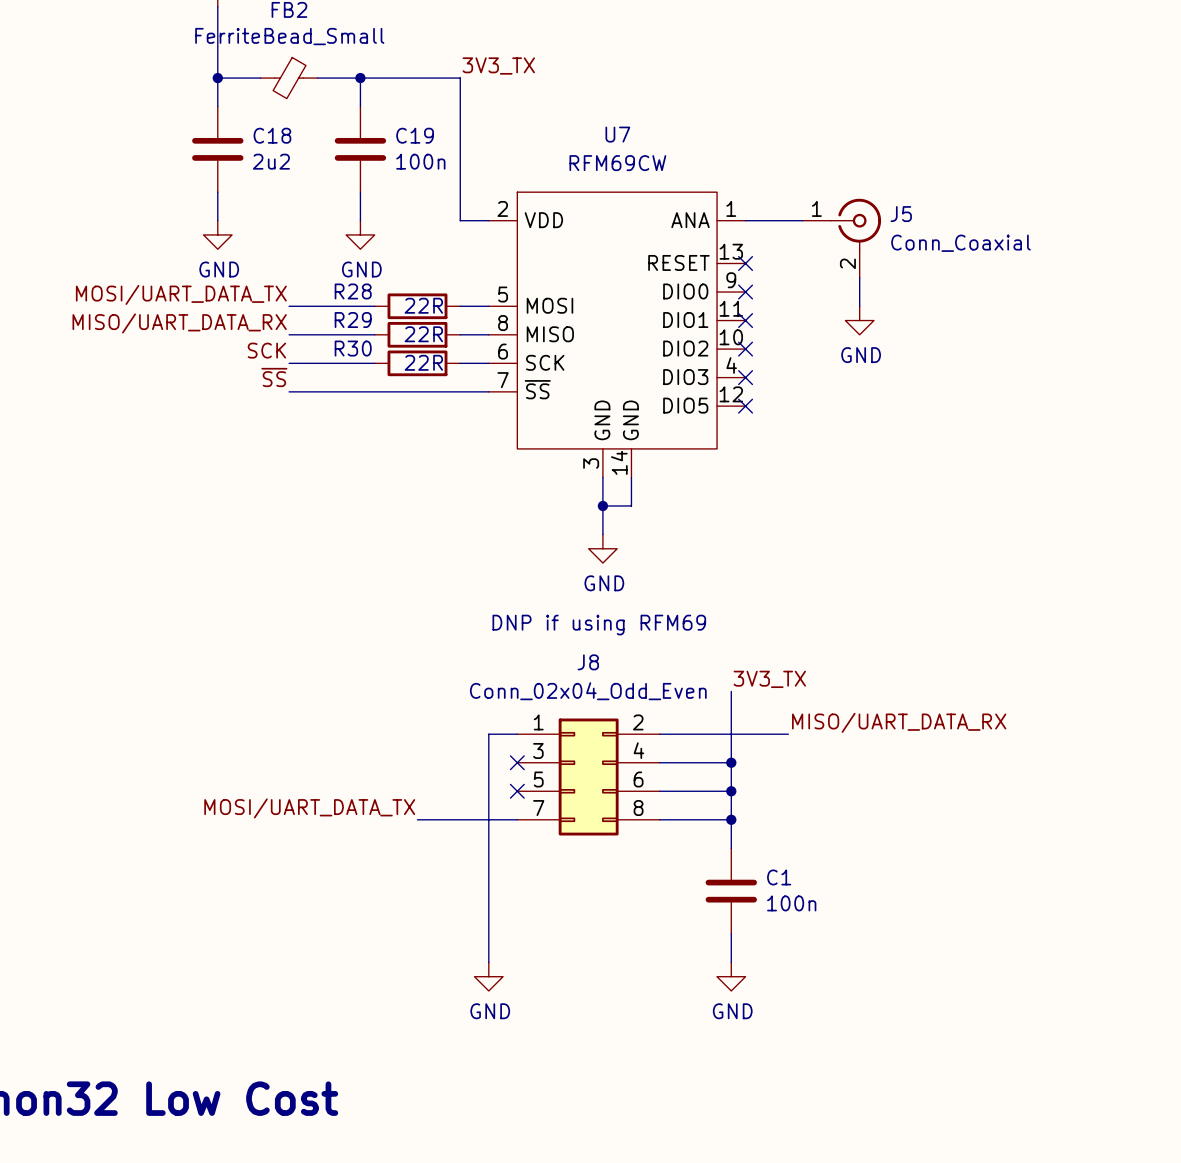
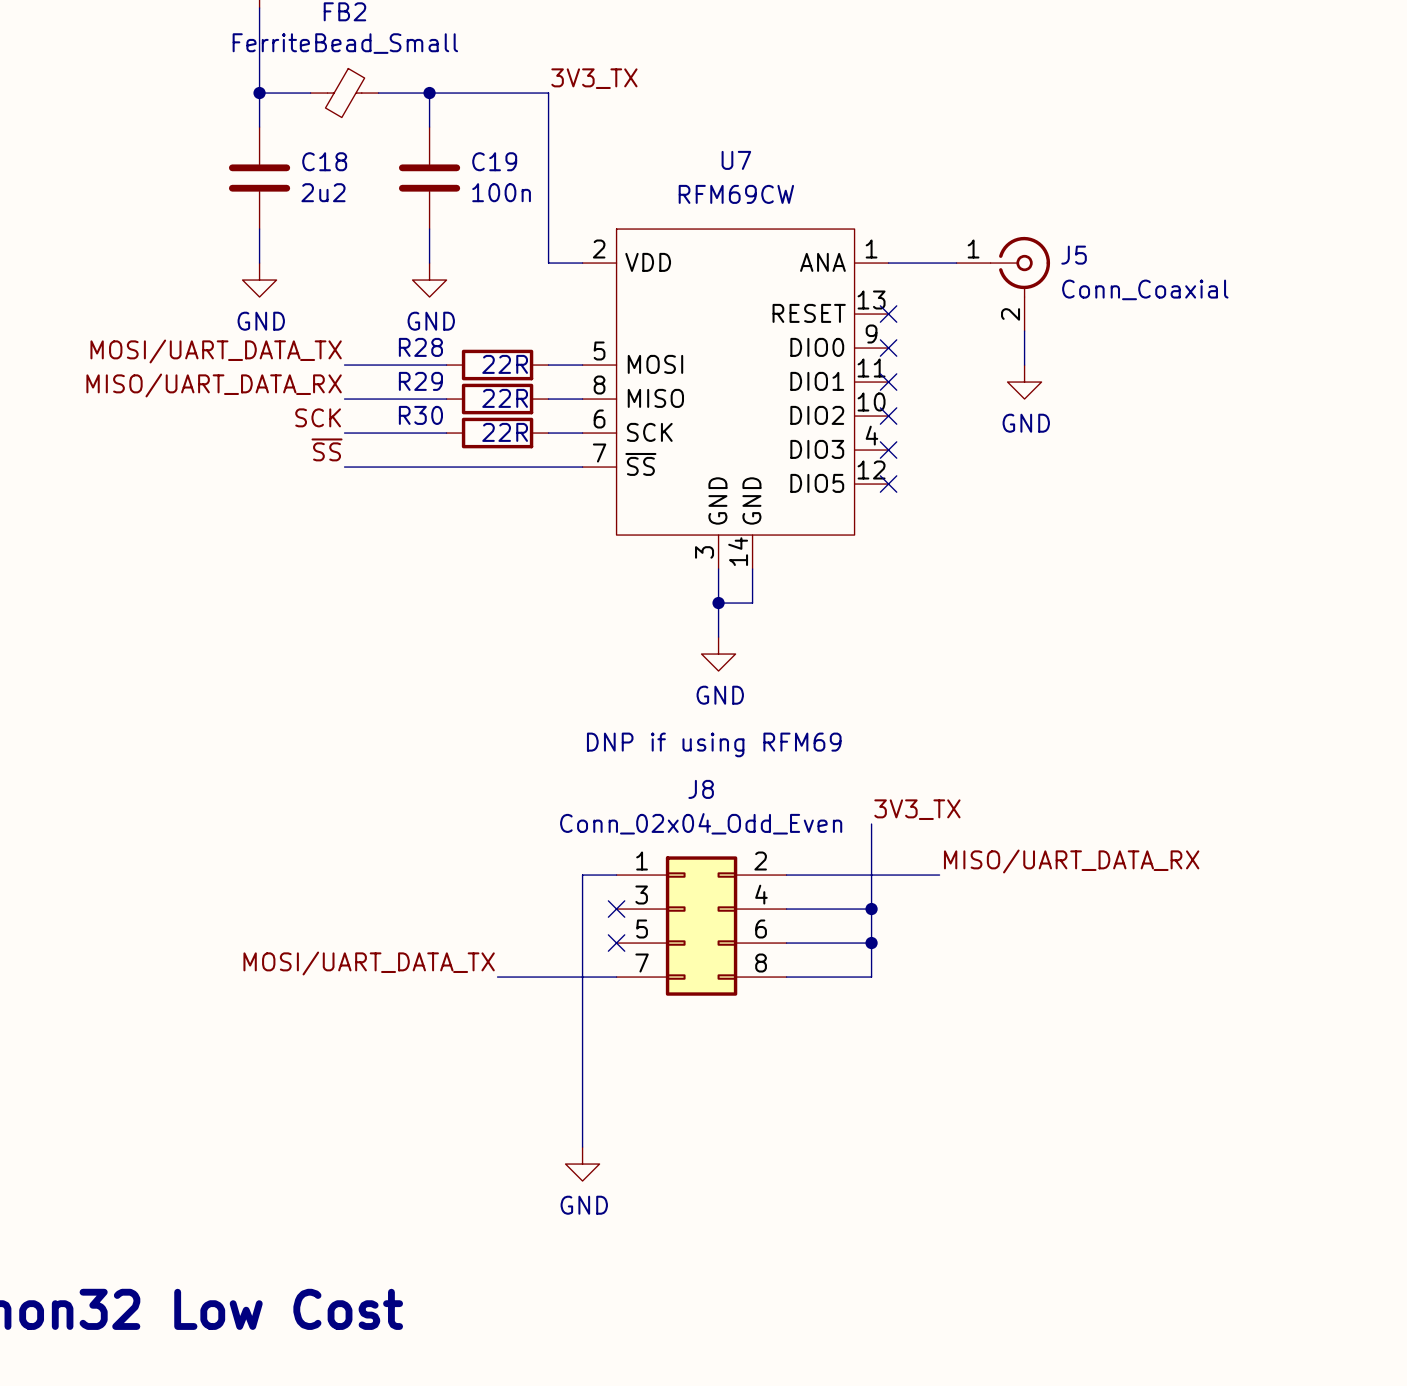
wire: (731, 819) (731, 848) -> none
junction: (731, 819) -> none
C1: 100n (731, 891) -> none
wire: (731, 933) (731, 962) -> none
power symbol: GND (731, 976) -> none

